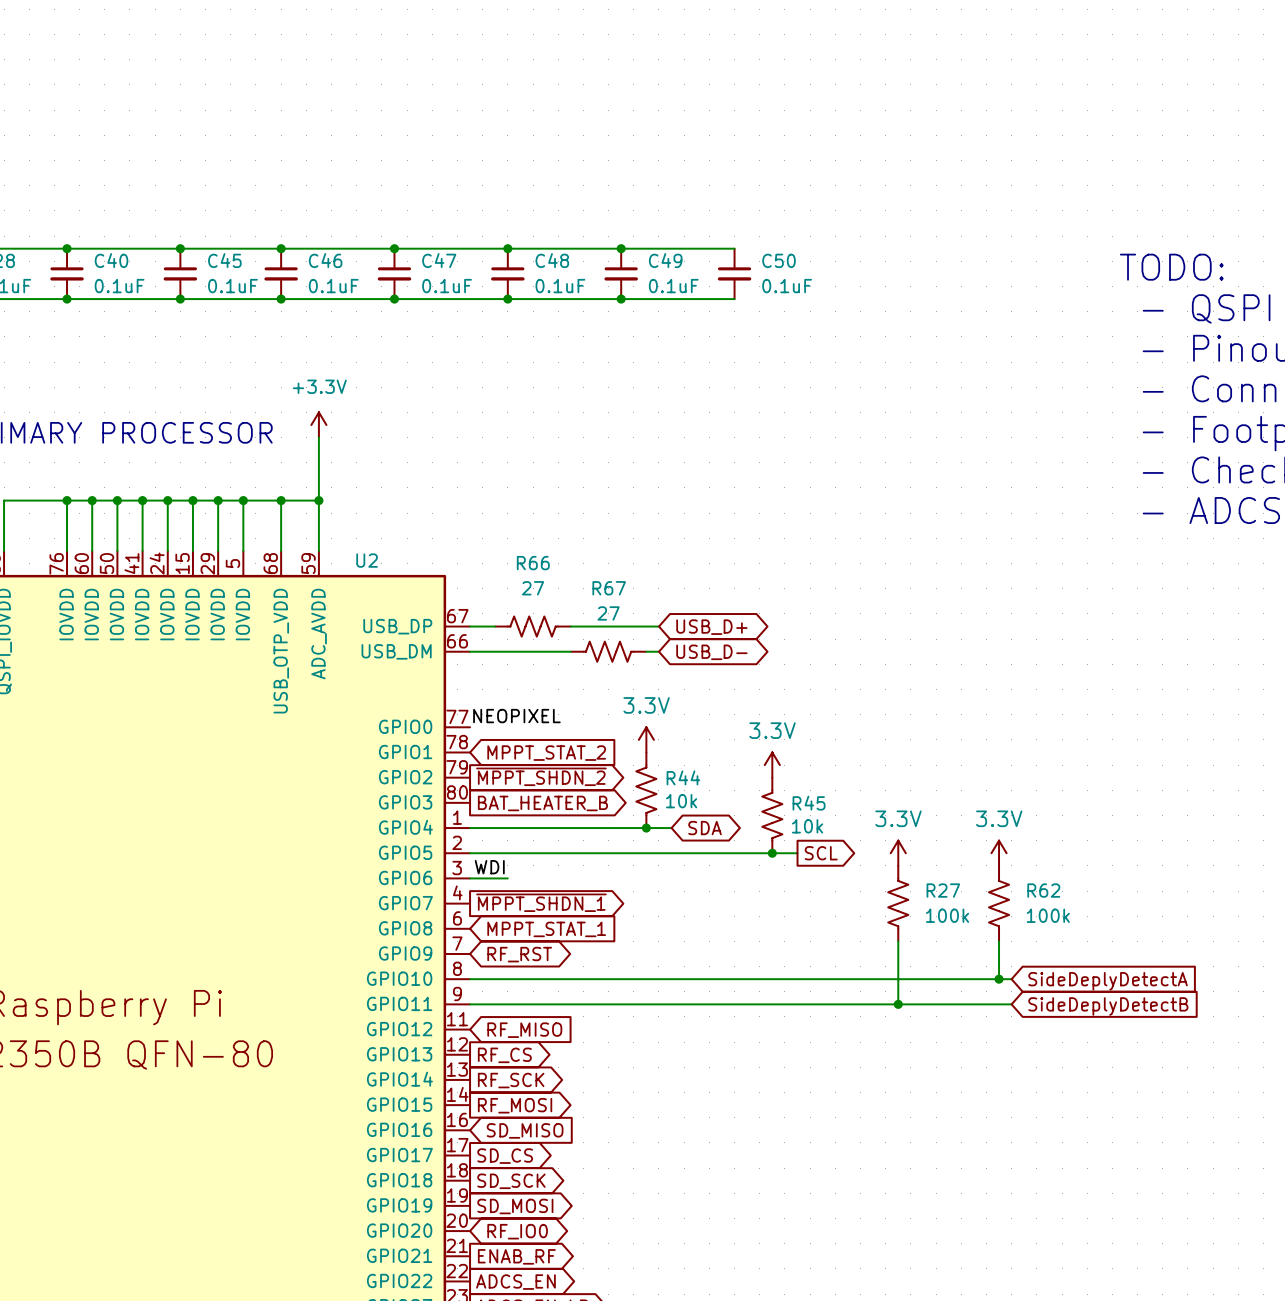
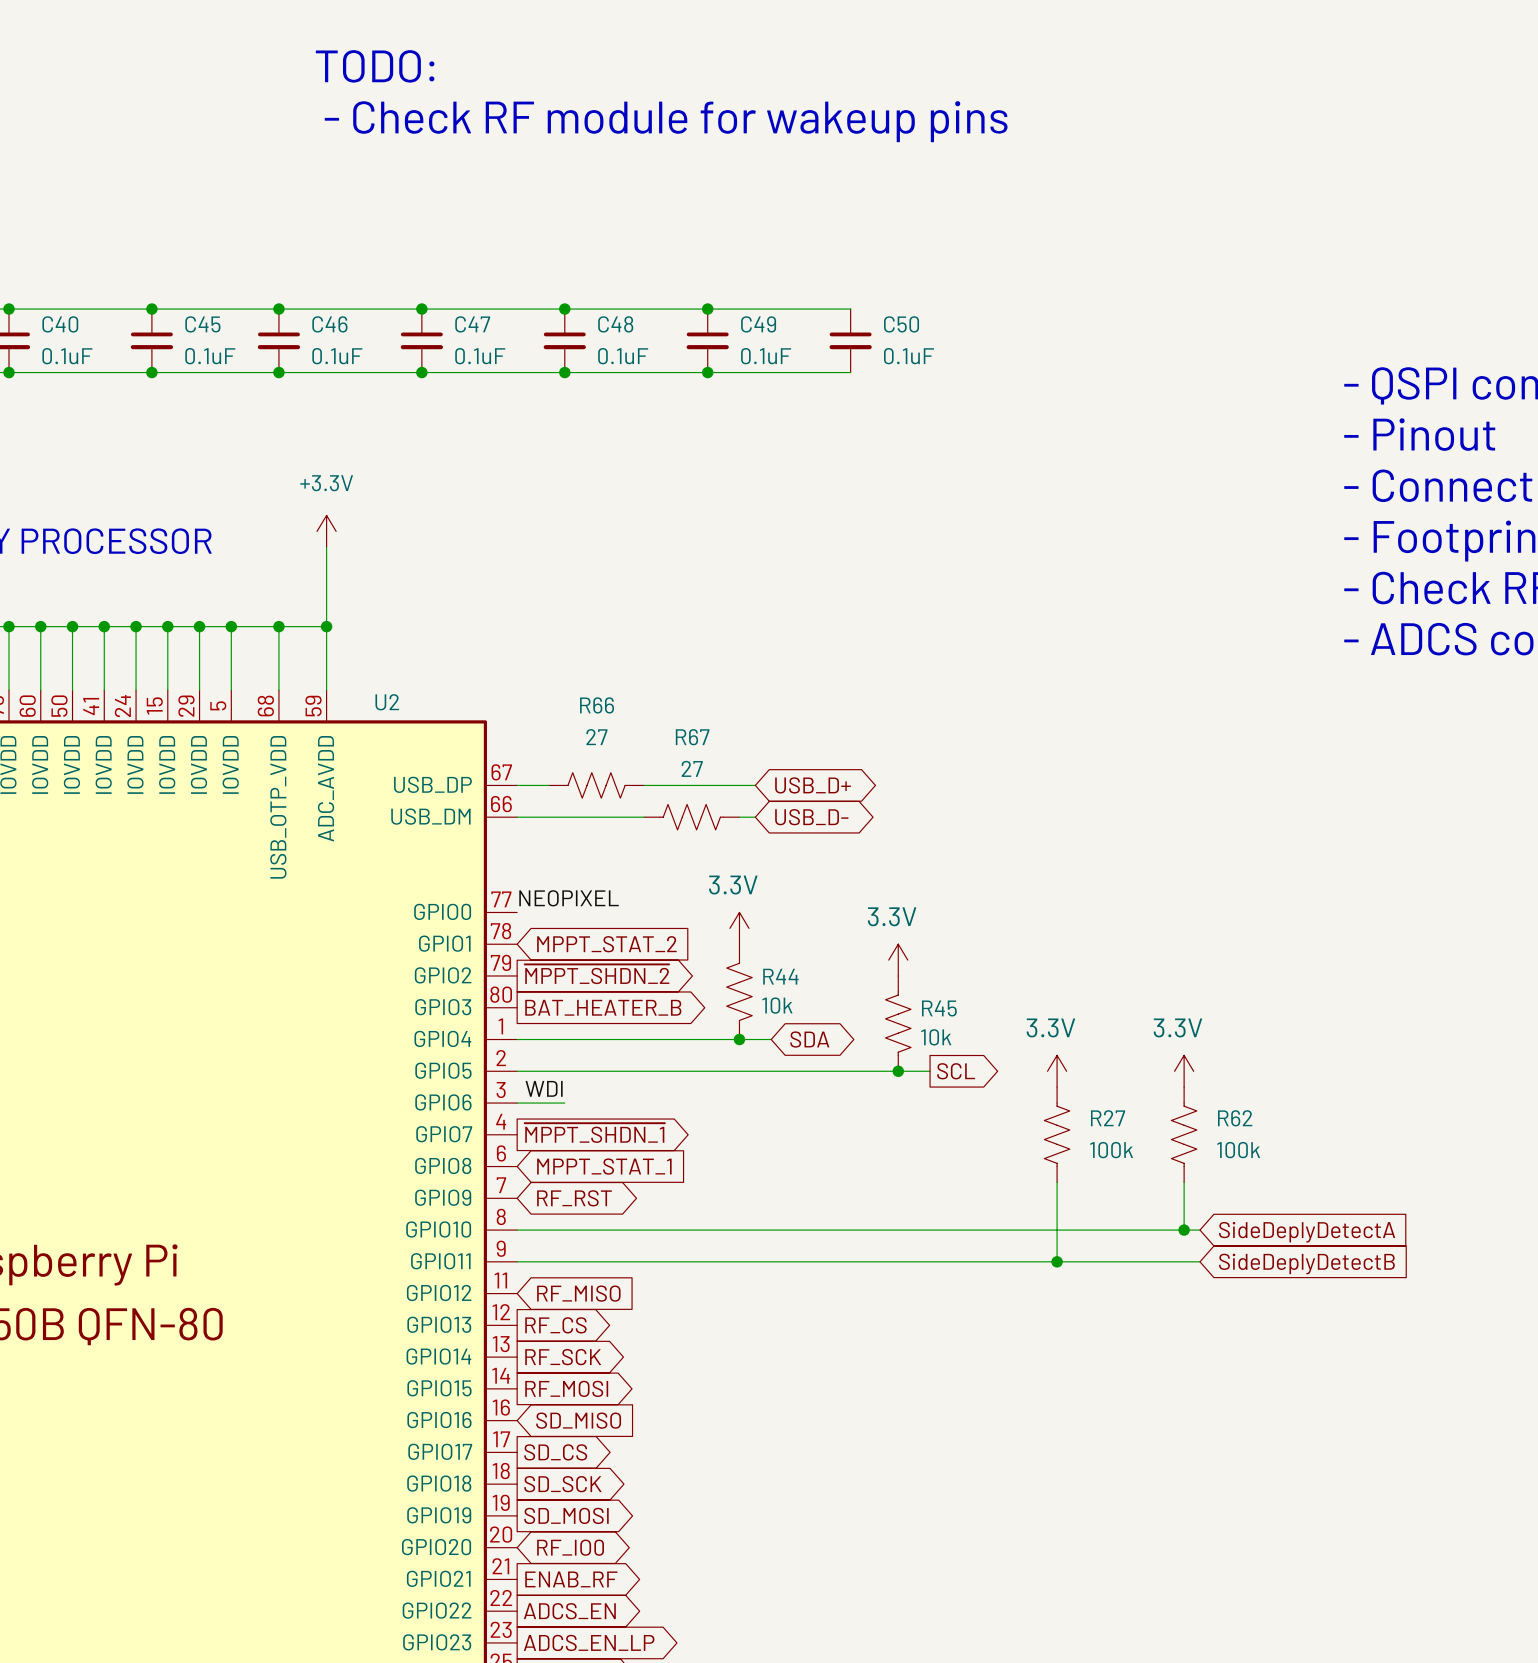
text: none -> TODO: (375, 66)
text: none -> - Check RF module for wakeup pins (666, 121)
text: TODO: (1171, 267) -> none

